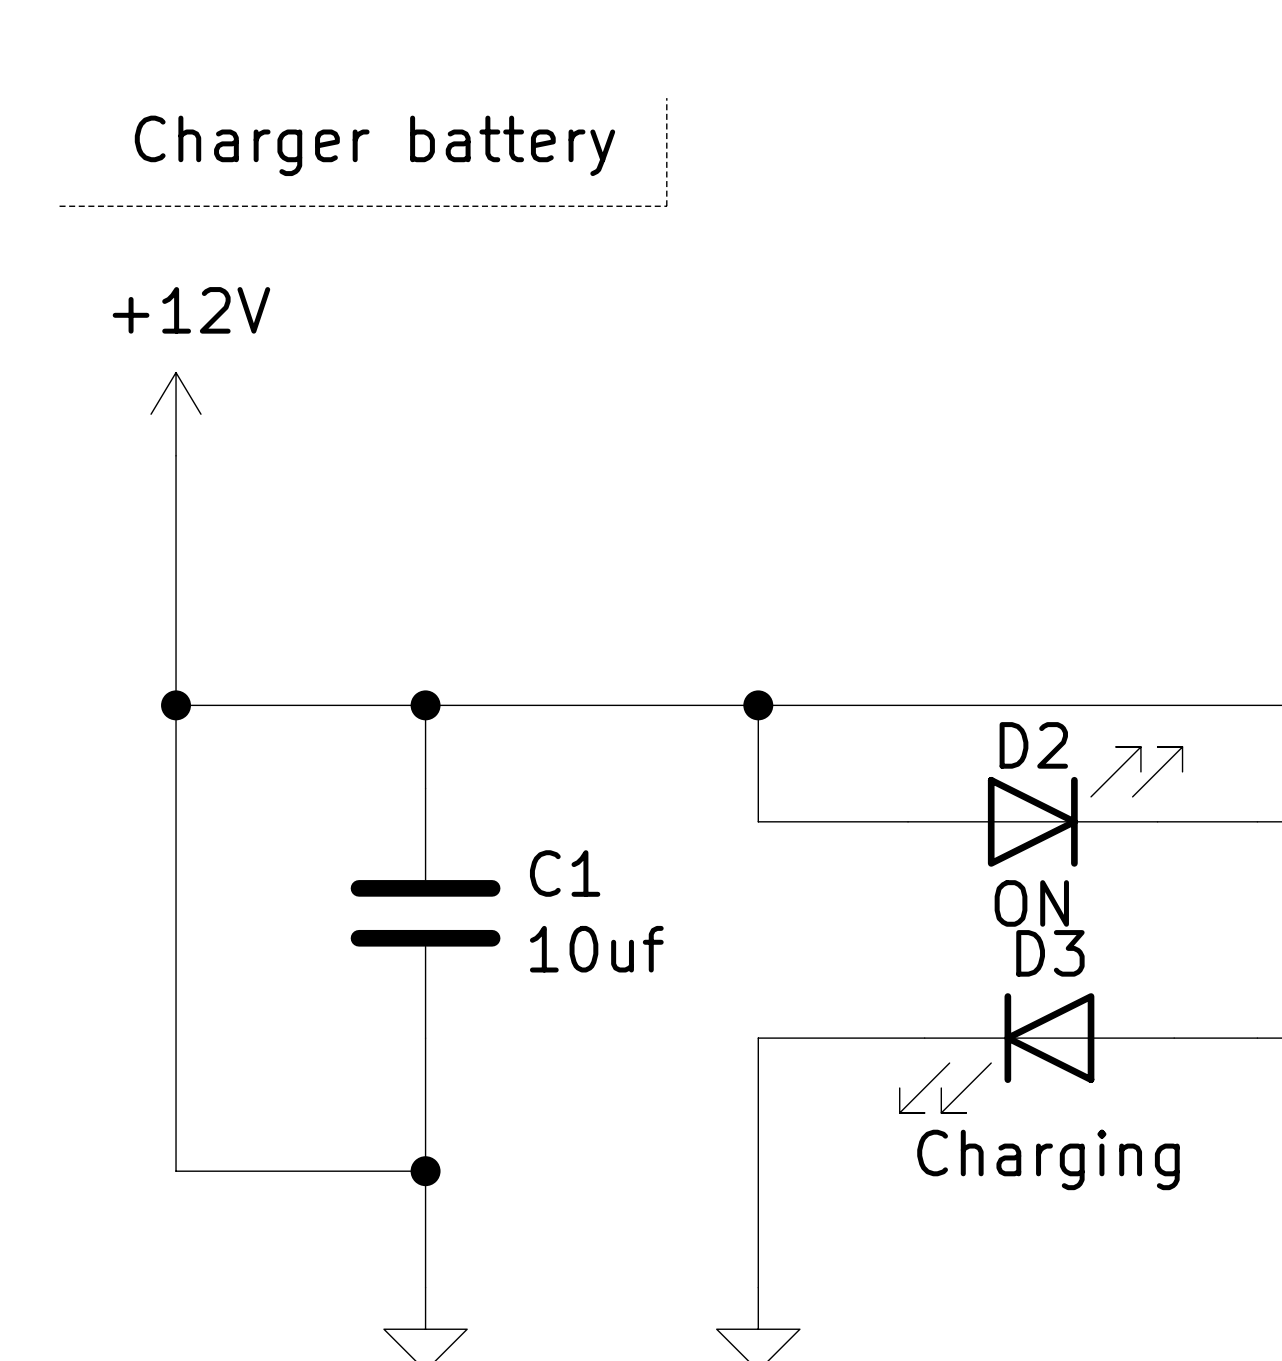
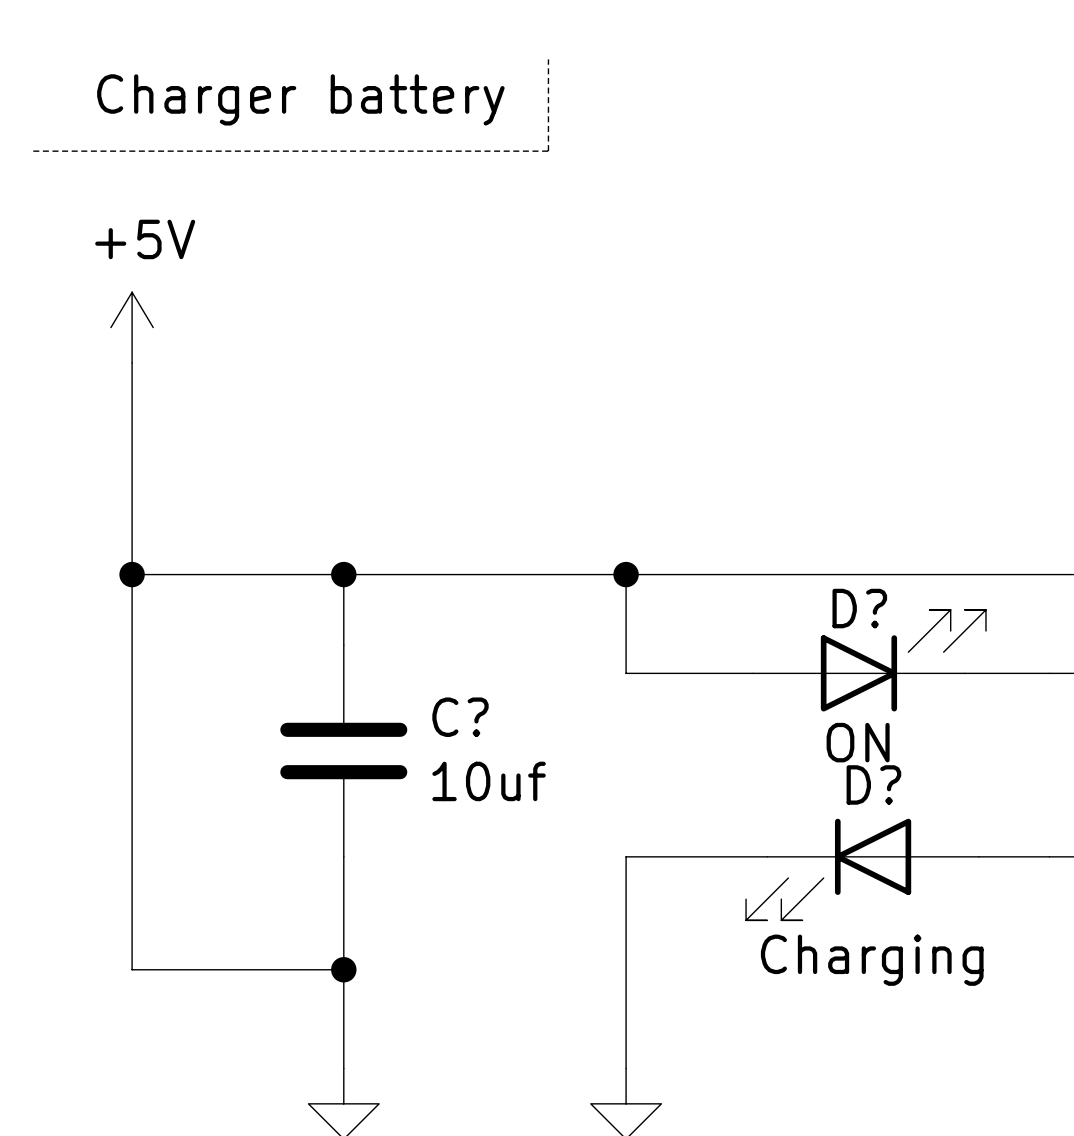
power symbol: +12V (176, 414) -> +5V (132, 327)
D2 name: D2 (1033, 745) -> D? (859, 608)
C1 name: C1 (565, 873) -> C? (460, 717)
D3 name: D3 (1050, 953) -> D? (873, 784)

